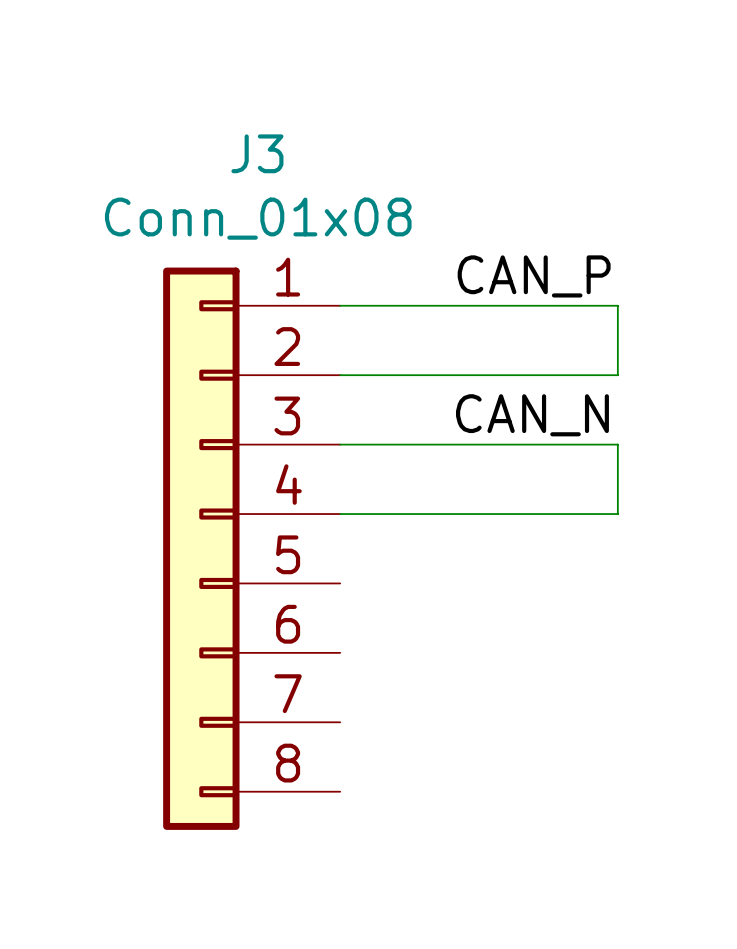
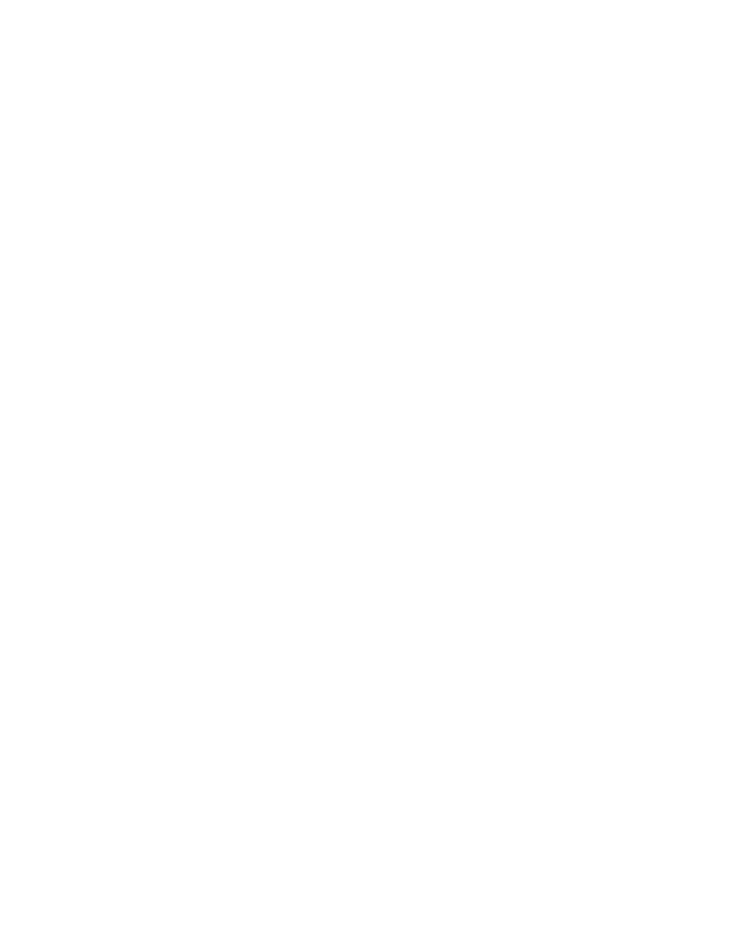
label: CAN_P (534, 276) -> none
wire: (340, 305) (617, 305) (617, 375) (340, 375) -> none
label: CAN_N (532, 415) -> none
wire: (340, 444) (617, 444) (617, 514) (340, 514) -> none
J3: Conn_01x08 (251, 548) -> none

